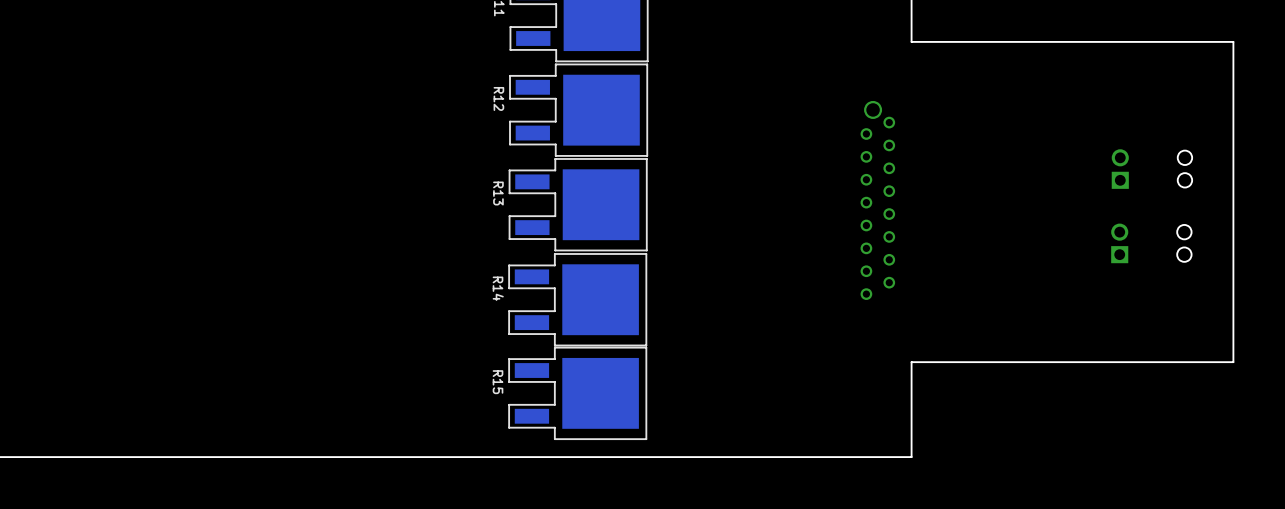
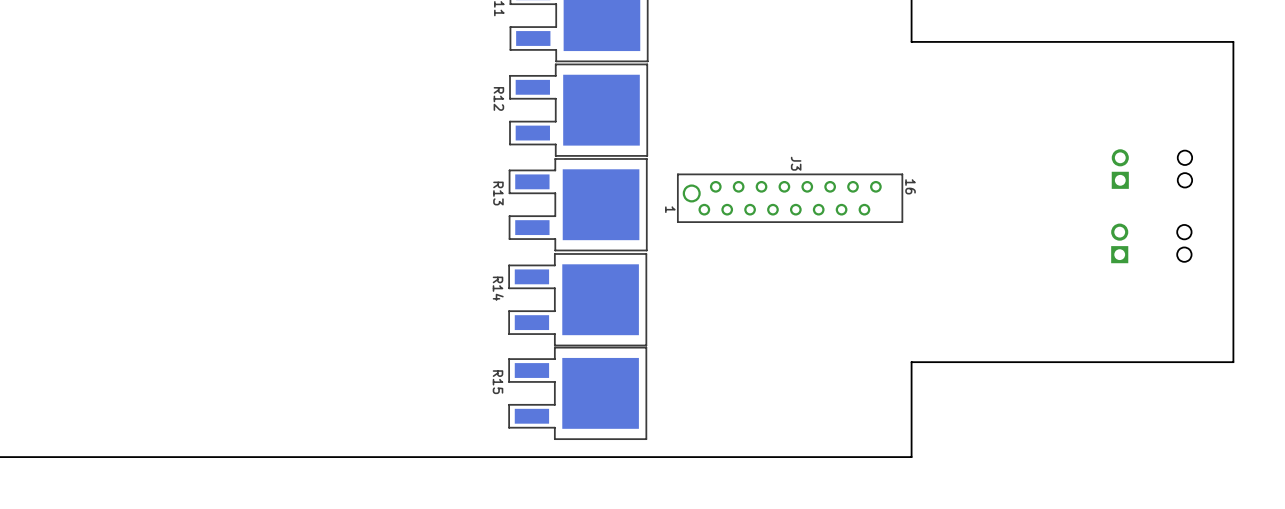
J3 side: top (877, 200) -> bottom (790, 198)

